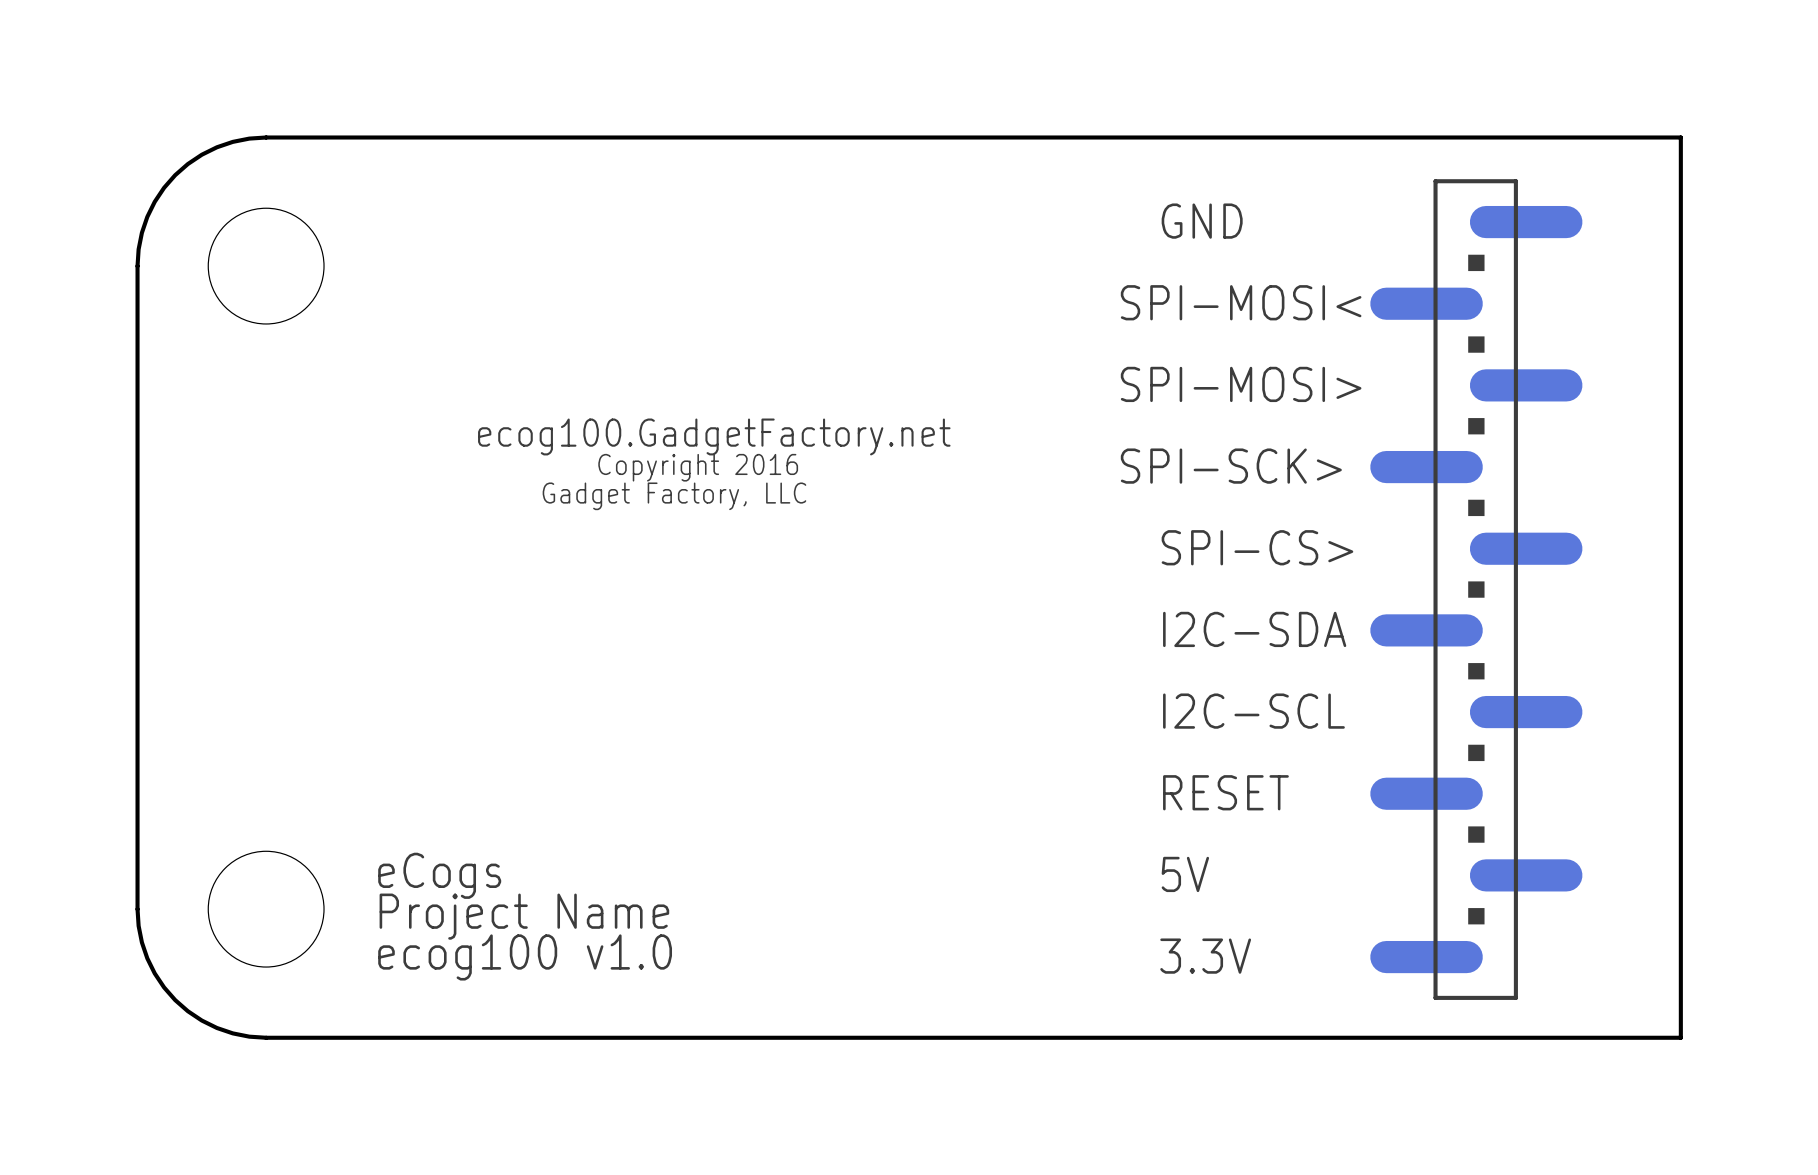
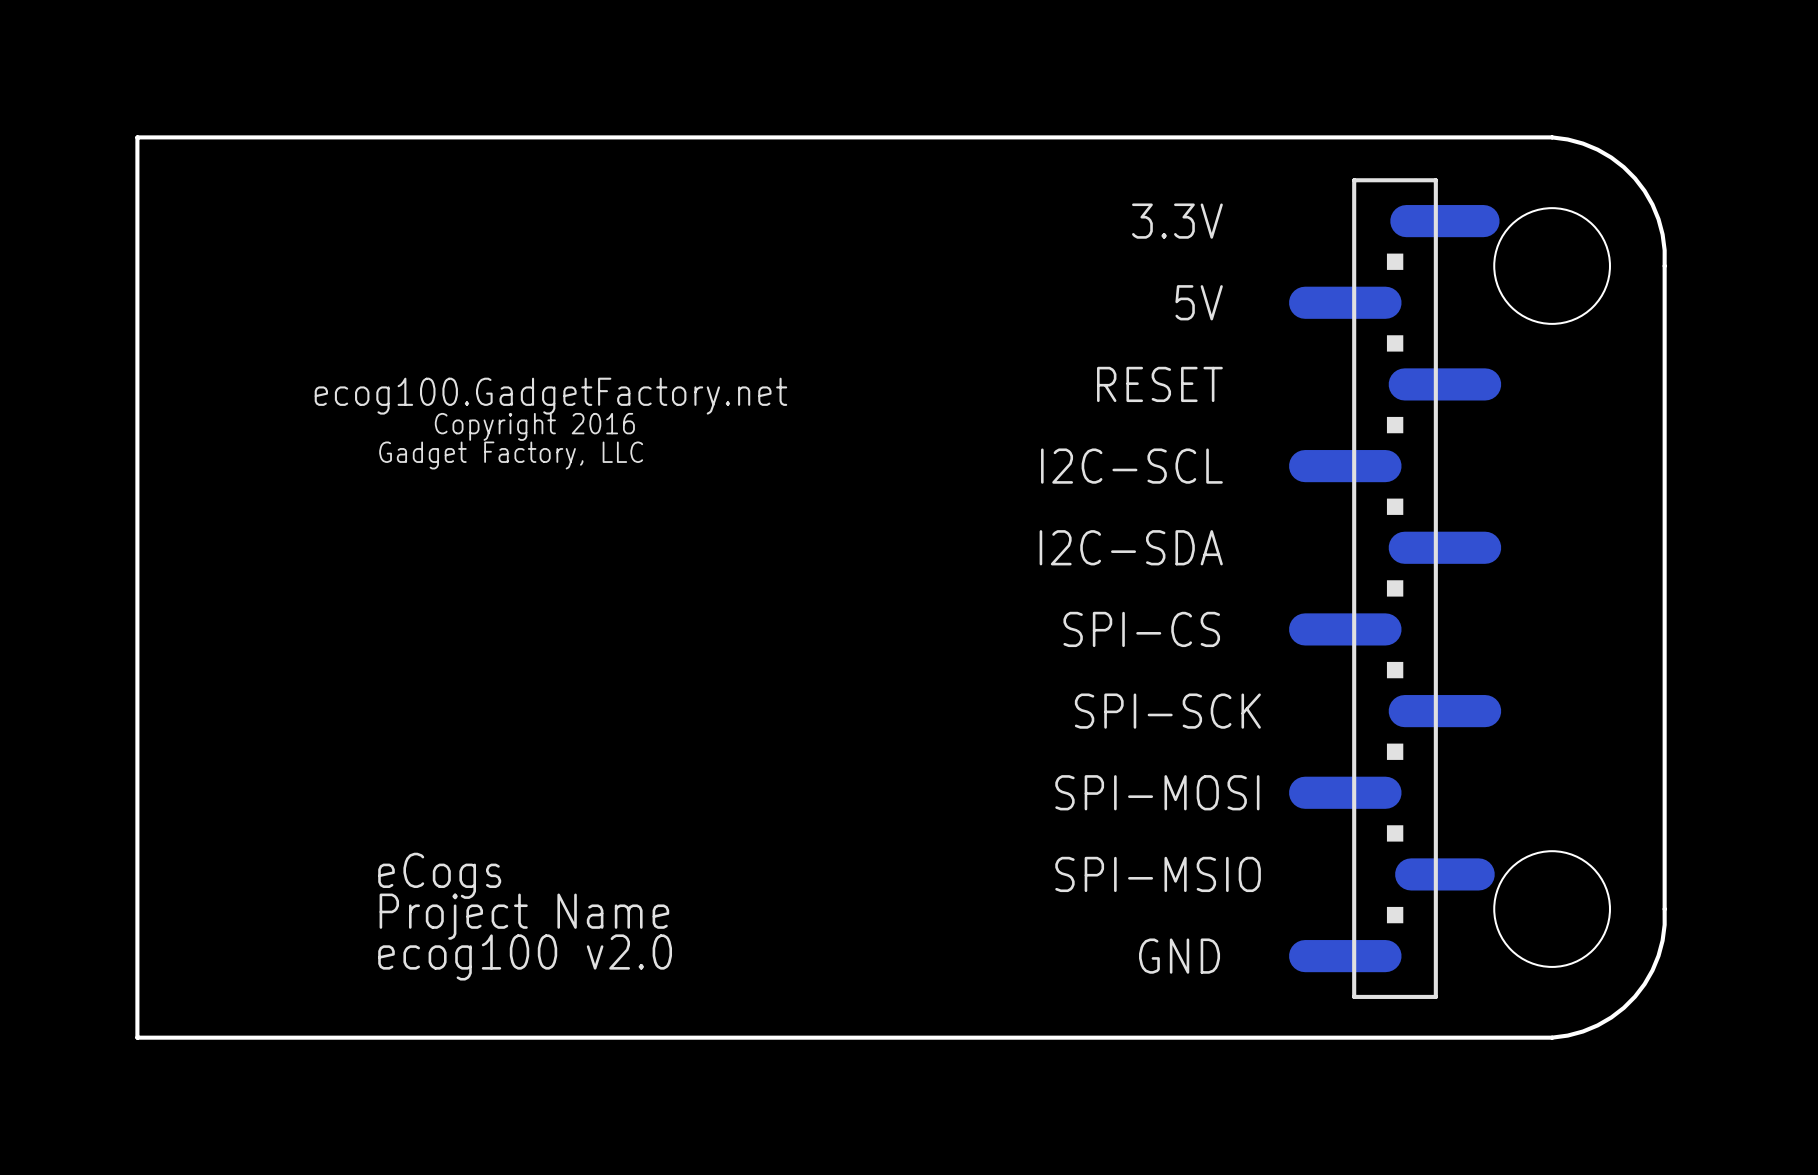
part footprint: [135, 135, 1683, 1040] -> [135, 135, 1667, 1040]
text position: GND (1202, 221) -> GND (1179, 956)
text: SPI-MOSI< (1241, 302) -> none
text: SPI-MOSI> (1241, 384) -> none
text position: ecog100.GadgetFactory.net (714, 436) -> ecog100.GadgetFactory.net (550, 396)
text: SPI-SCK> (1231, 466) -> none
text position: Copyright 2016 (698, 467) -> Copyright 2016 (534, 426)
text position: Gadget Factory, LLC (674, 496) -> Gadget Factory, LLC (511, 455)
text: SPI-CS> (1257, 547) -> none
text: none -> SPI-CS (1141, 629)
text position: I2C-SDA (1254, 629) -> I2C-SDA (1131, 547)
text: none -> SPI-SCK (1167, 711)
text position: I2C-SCL (1253, 711) -> I2C-SCL (1131, 466)
text: none -> SPI-MOSI (1157, 792)
text position: RESET (1225, 792) -> RESET (1159, 384)
text: none -> SPI-MSIO (1158, 874)
text position: 5V (1185, 874) -> 5V (1199, 302)
text position: 3.3V (1205, 956) -> 3.3V (1177, 221)
text: ecog100 v1.0 (525, 957) -> ecog100 v2.0 (525, 957)

